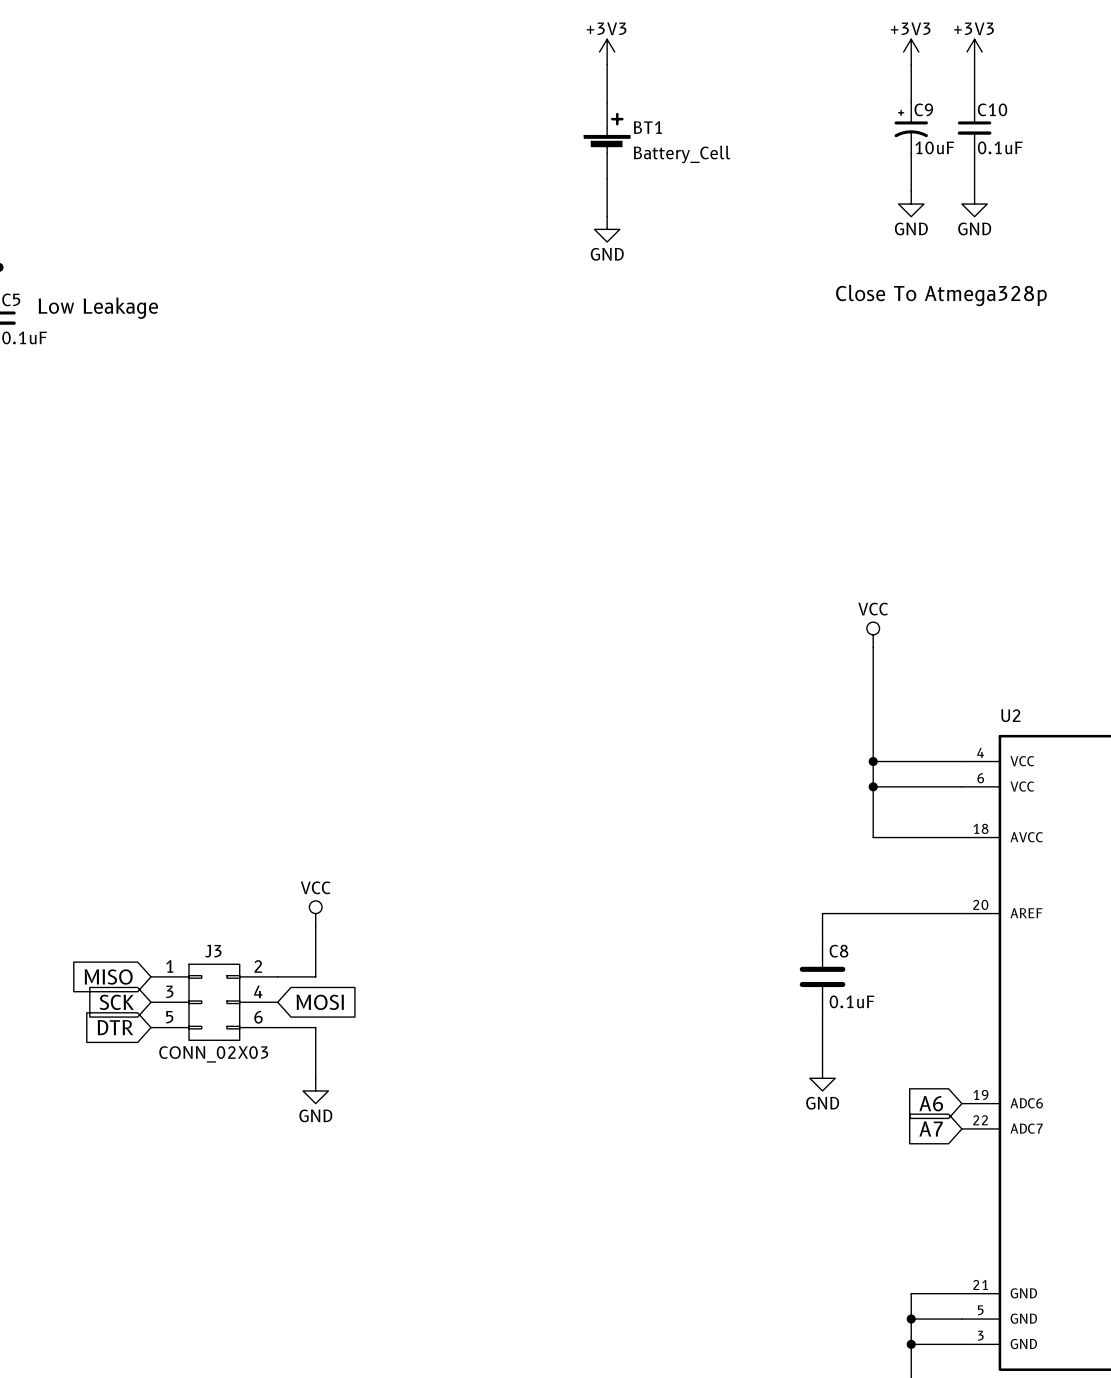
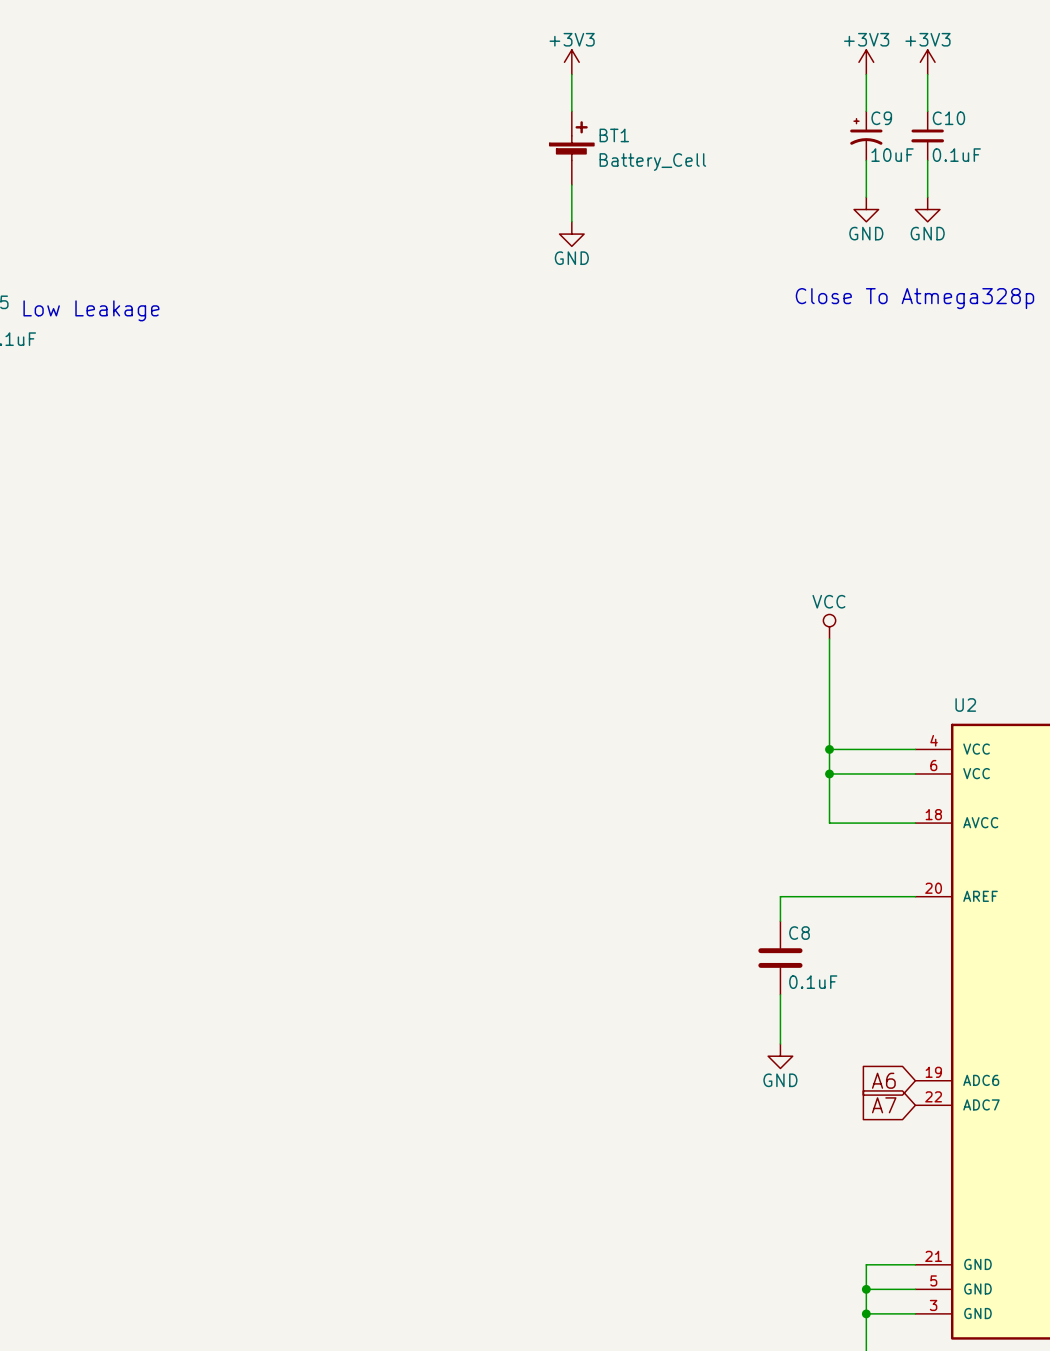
power symbol: VCC (315, 913) -> none
wire: (315, 926) (315, 976) (277, 976) -> none
global label: MISO (108, 977) -> none
global label: SCK (116, 1002) -> none
J3: CONN_02X03 (214, 1002) -> none
global label: MOSI (320, 1002) -> none
global label: DTR (115, 1027) -> none
wire: (277, 1027) (315, 1027) (315, 1078) -> none
power symbol: GND (315, 1090) -> none

